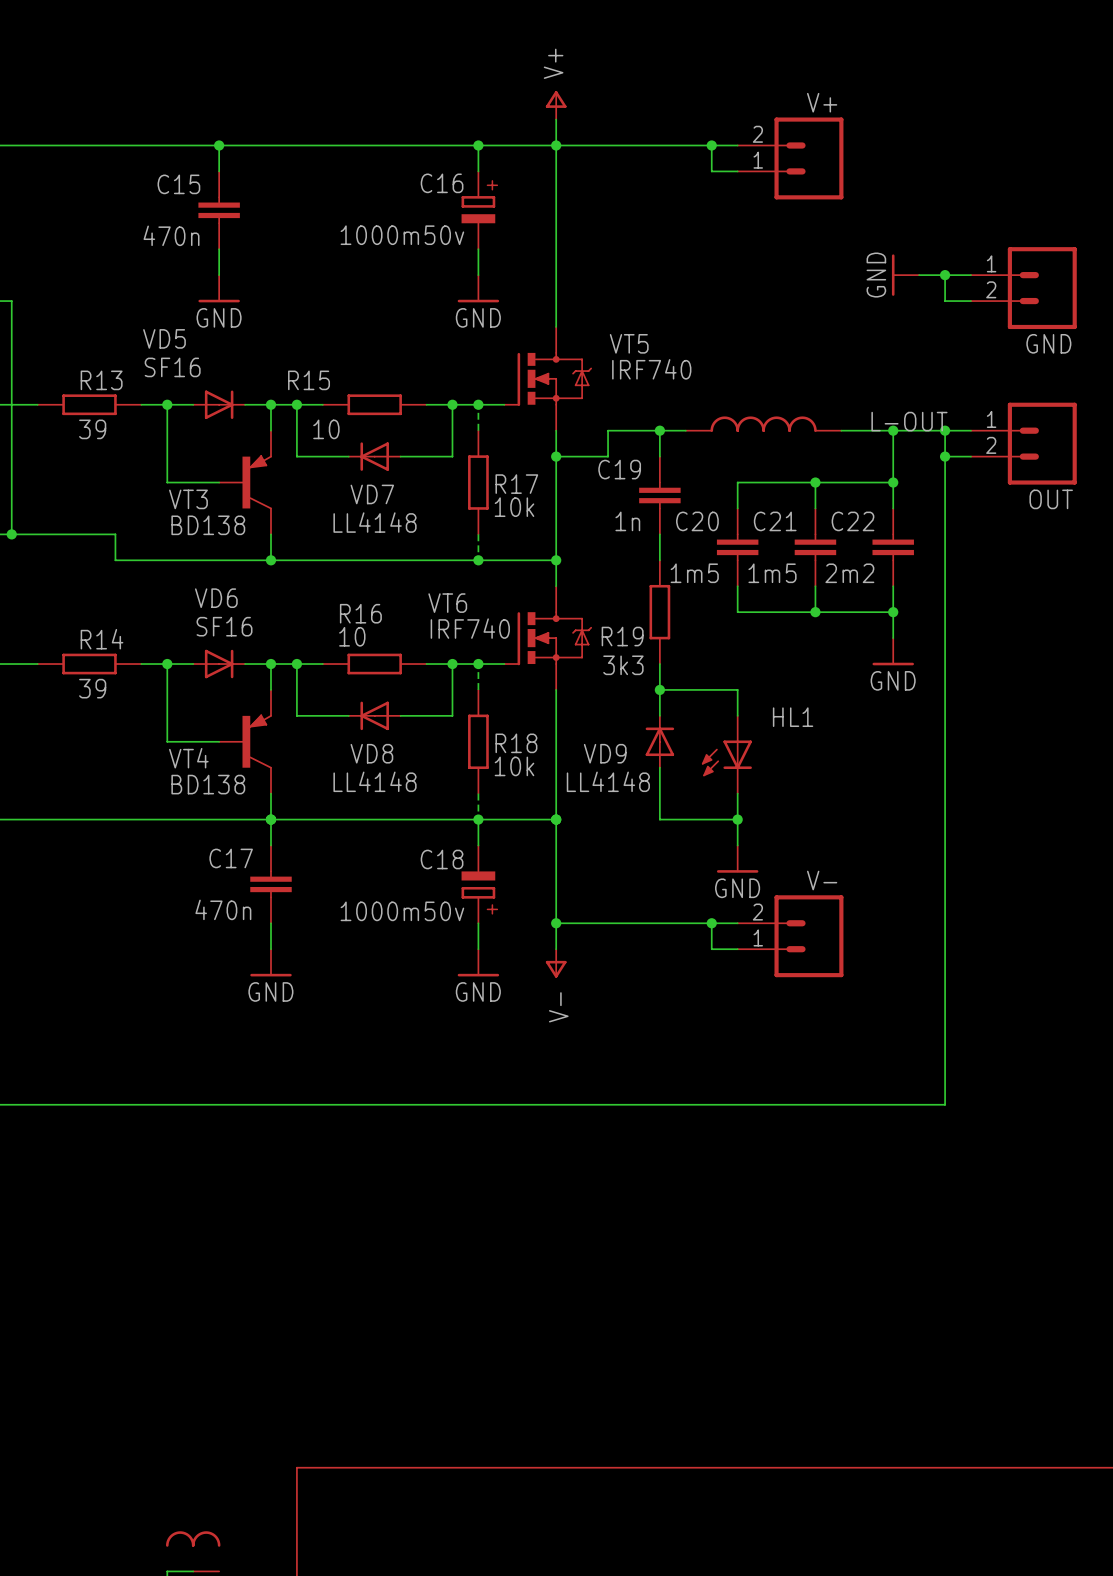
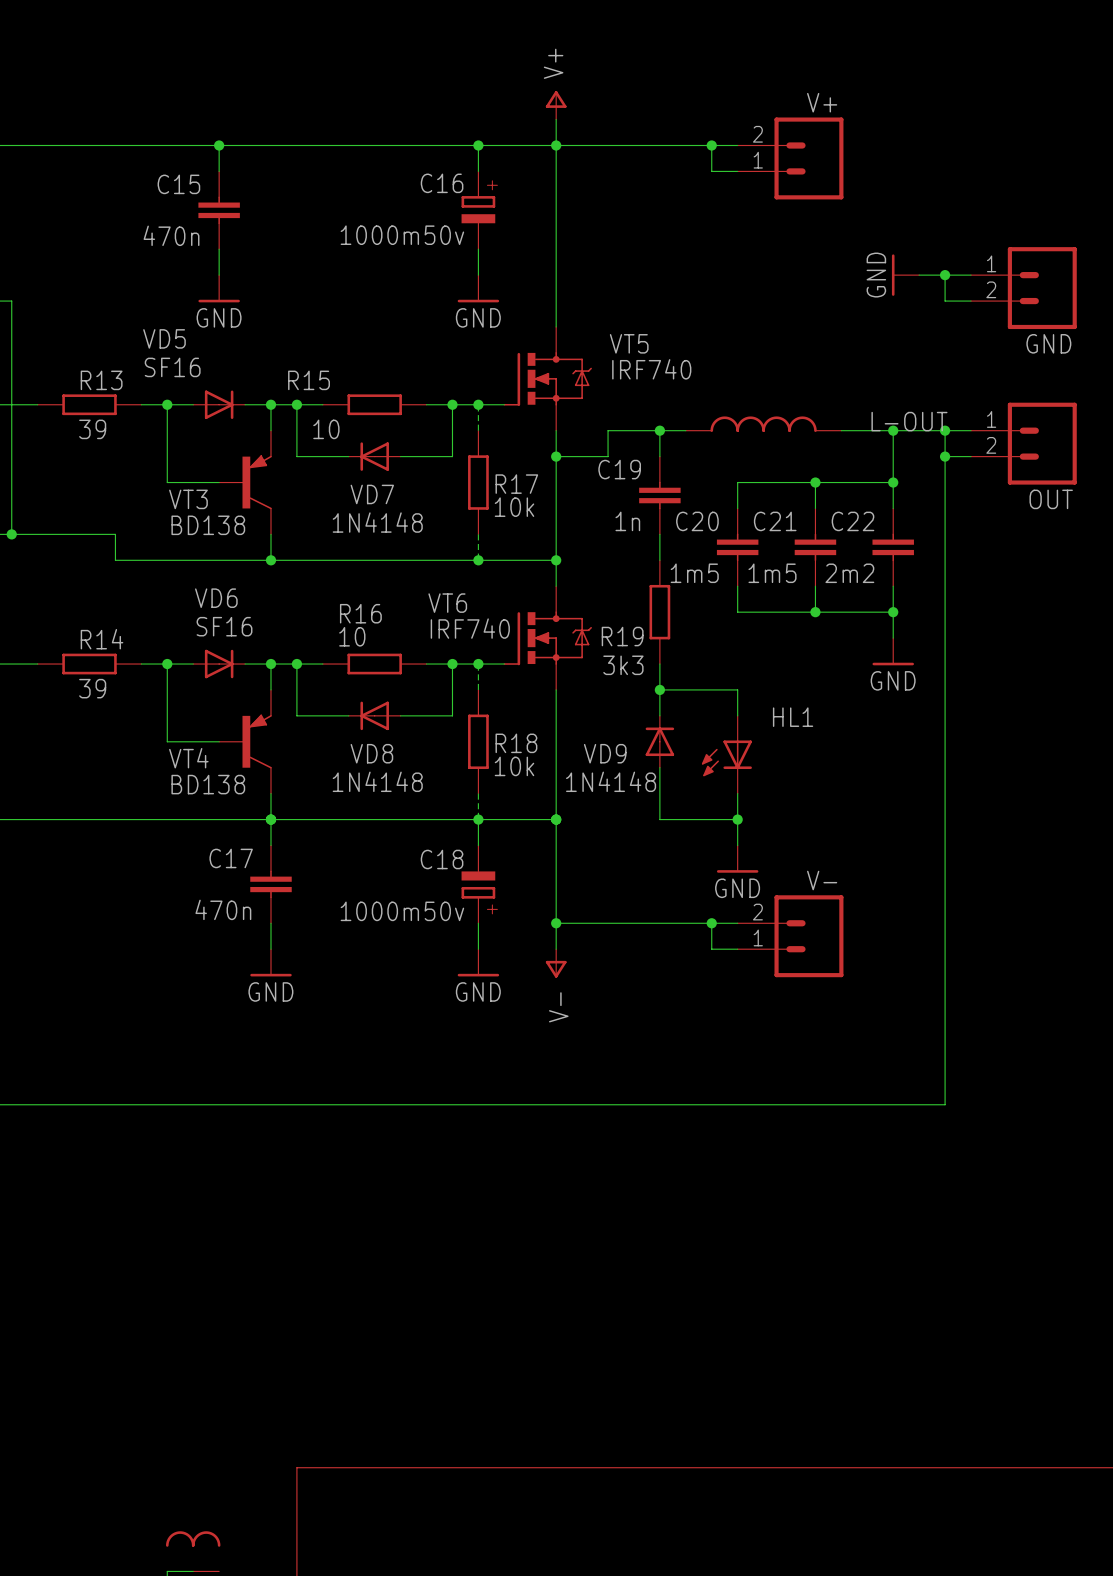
VD7 value: LL4148 (375, 522) -> 1N4148 (377, 522)
VD8 value: LL4148 (375, 781) -> 1N4148 (377, 781)
VD9 value: LL4148 (608, 781) -> 1N4148 (611, 781)

